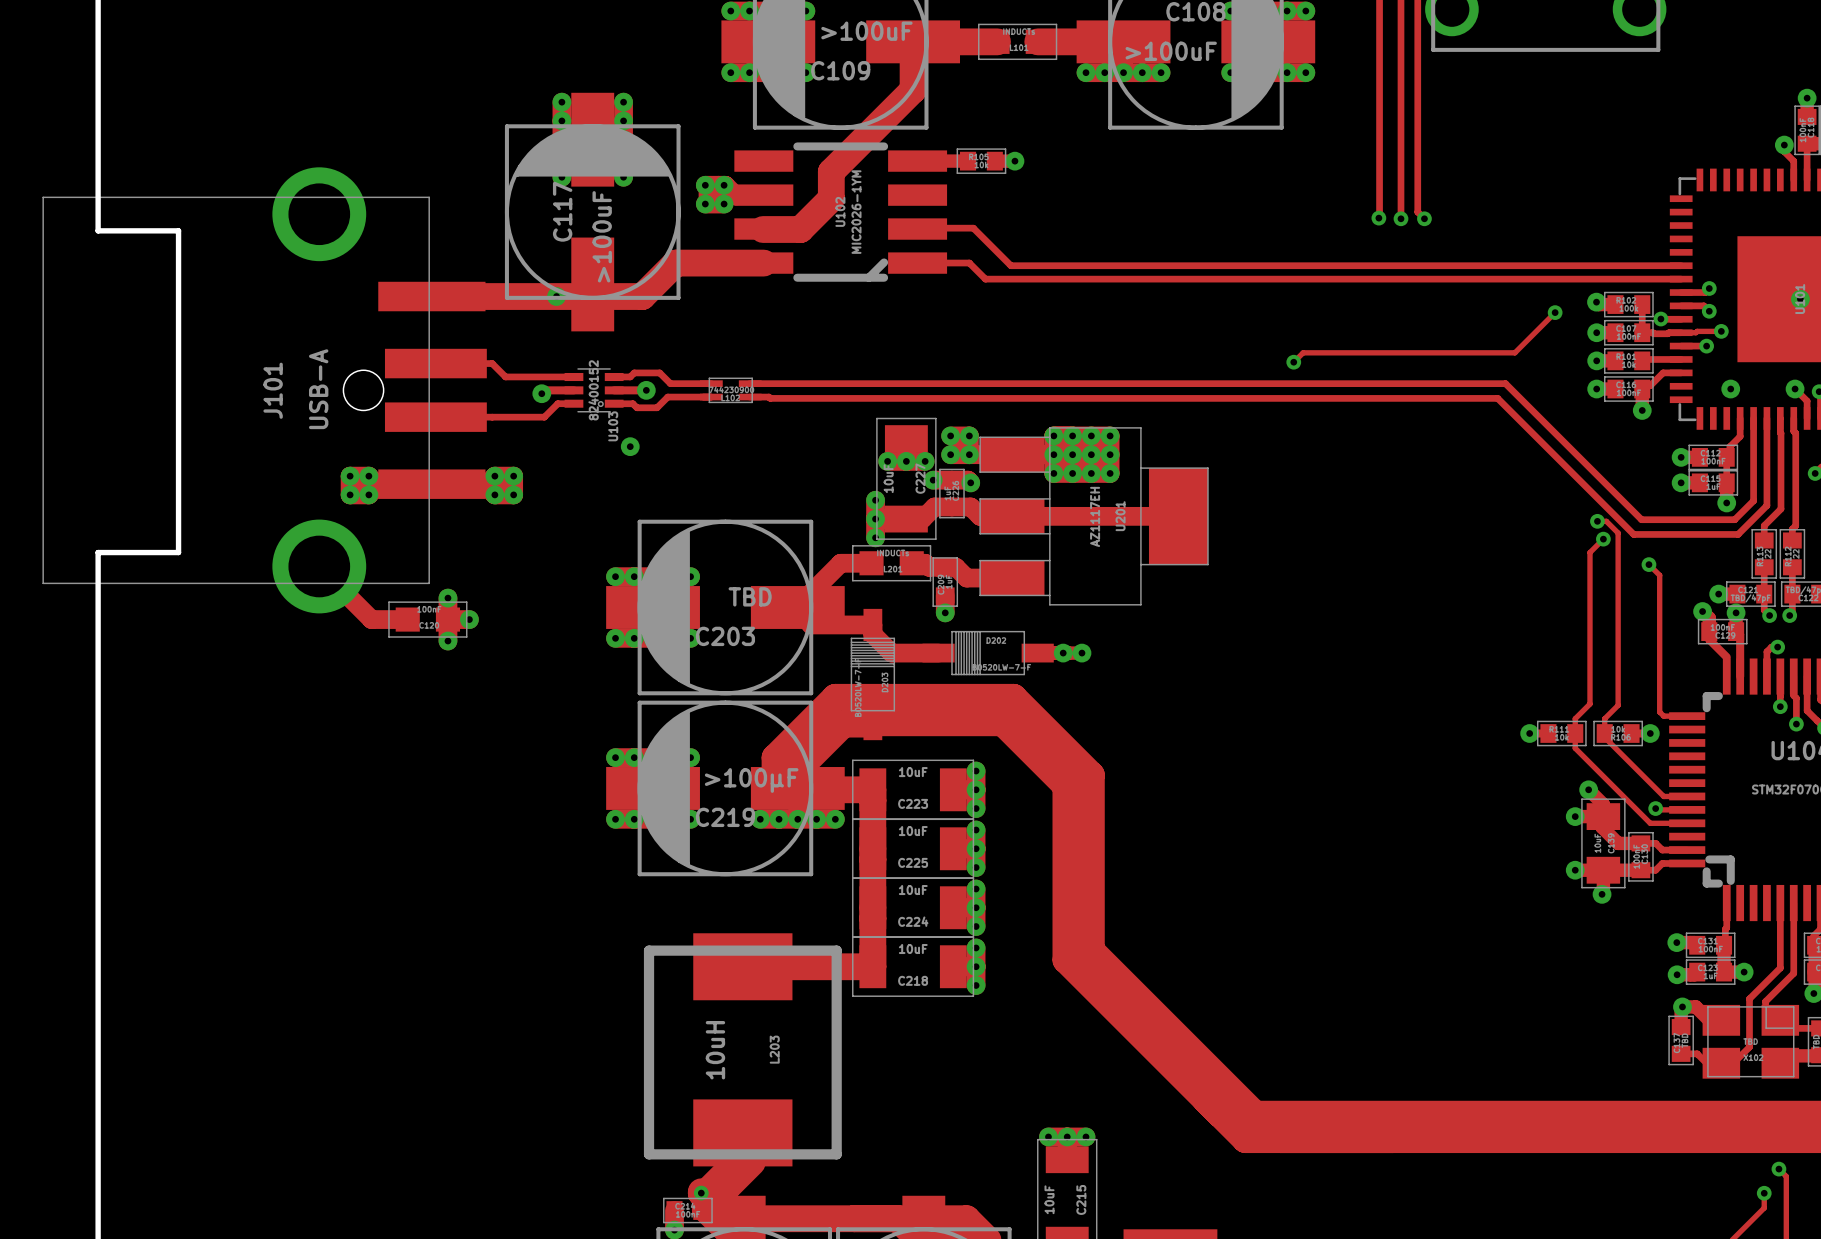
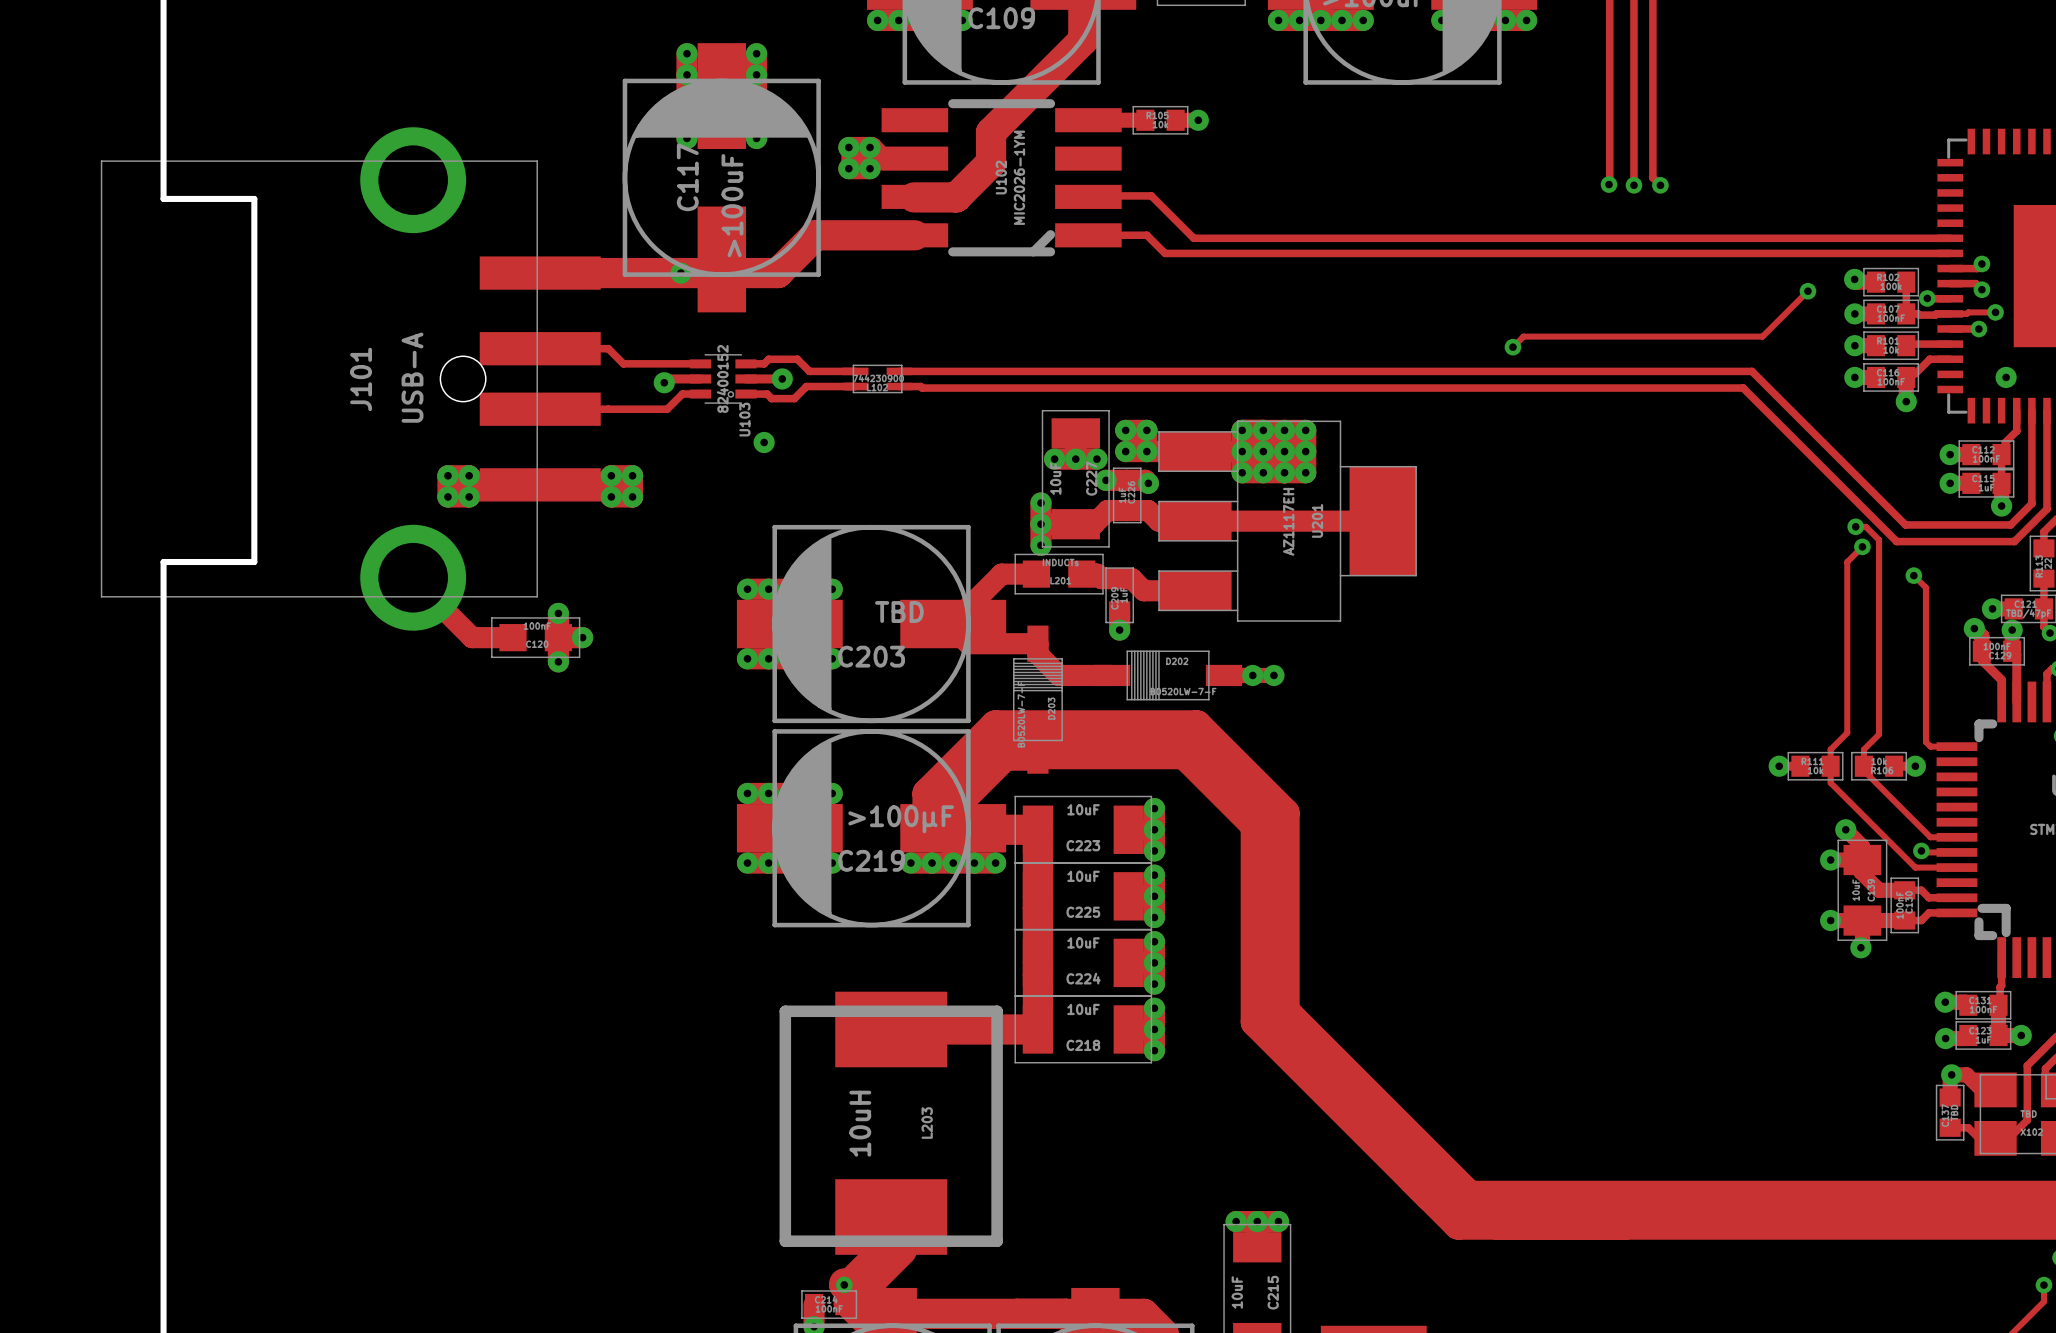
J101 footprint: [43, 167, 487, 614] -> [101, 127, 601, 631]

